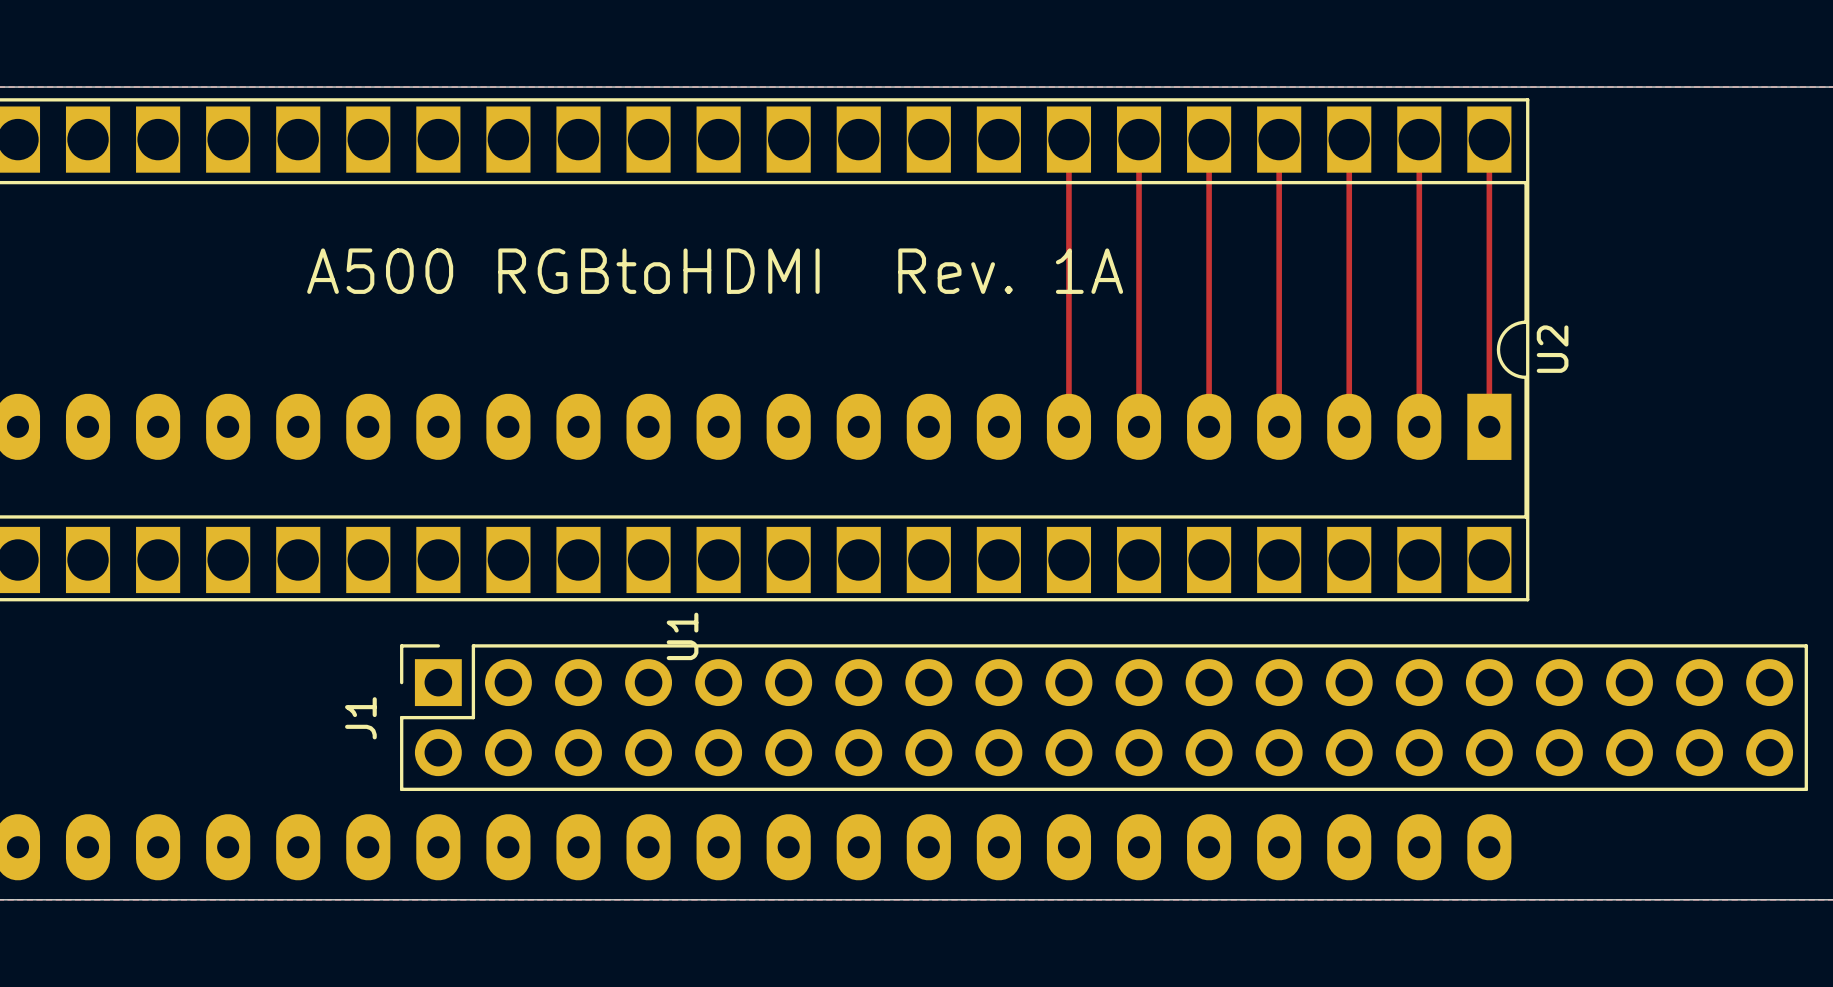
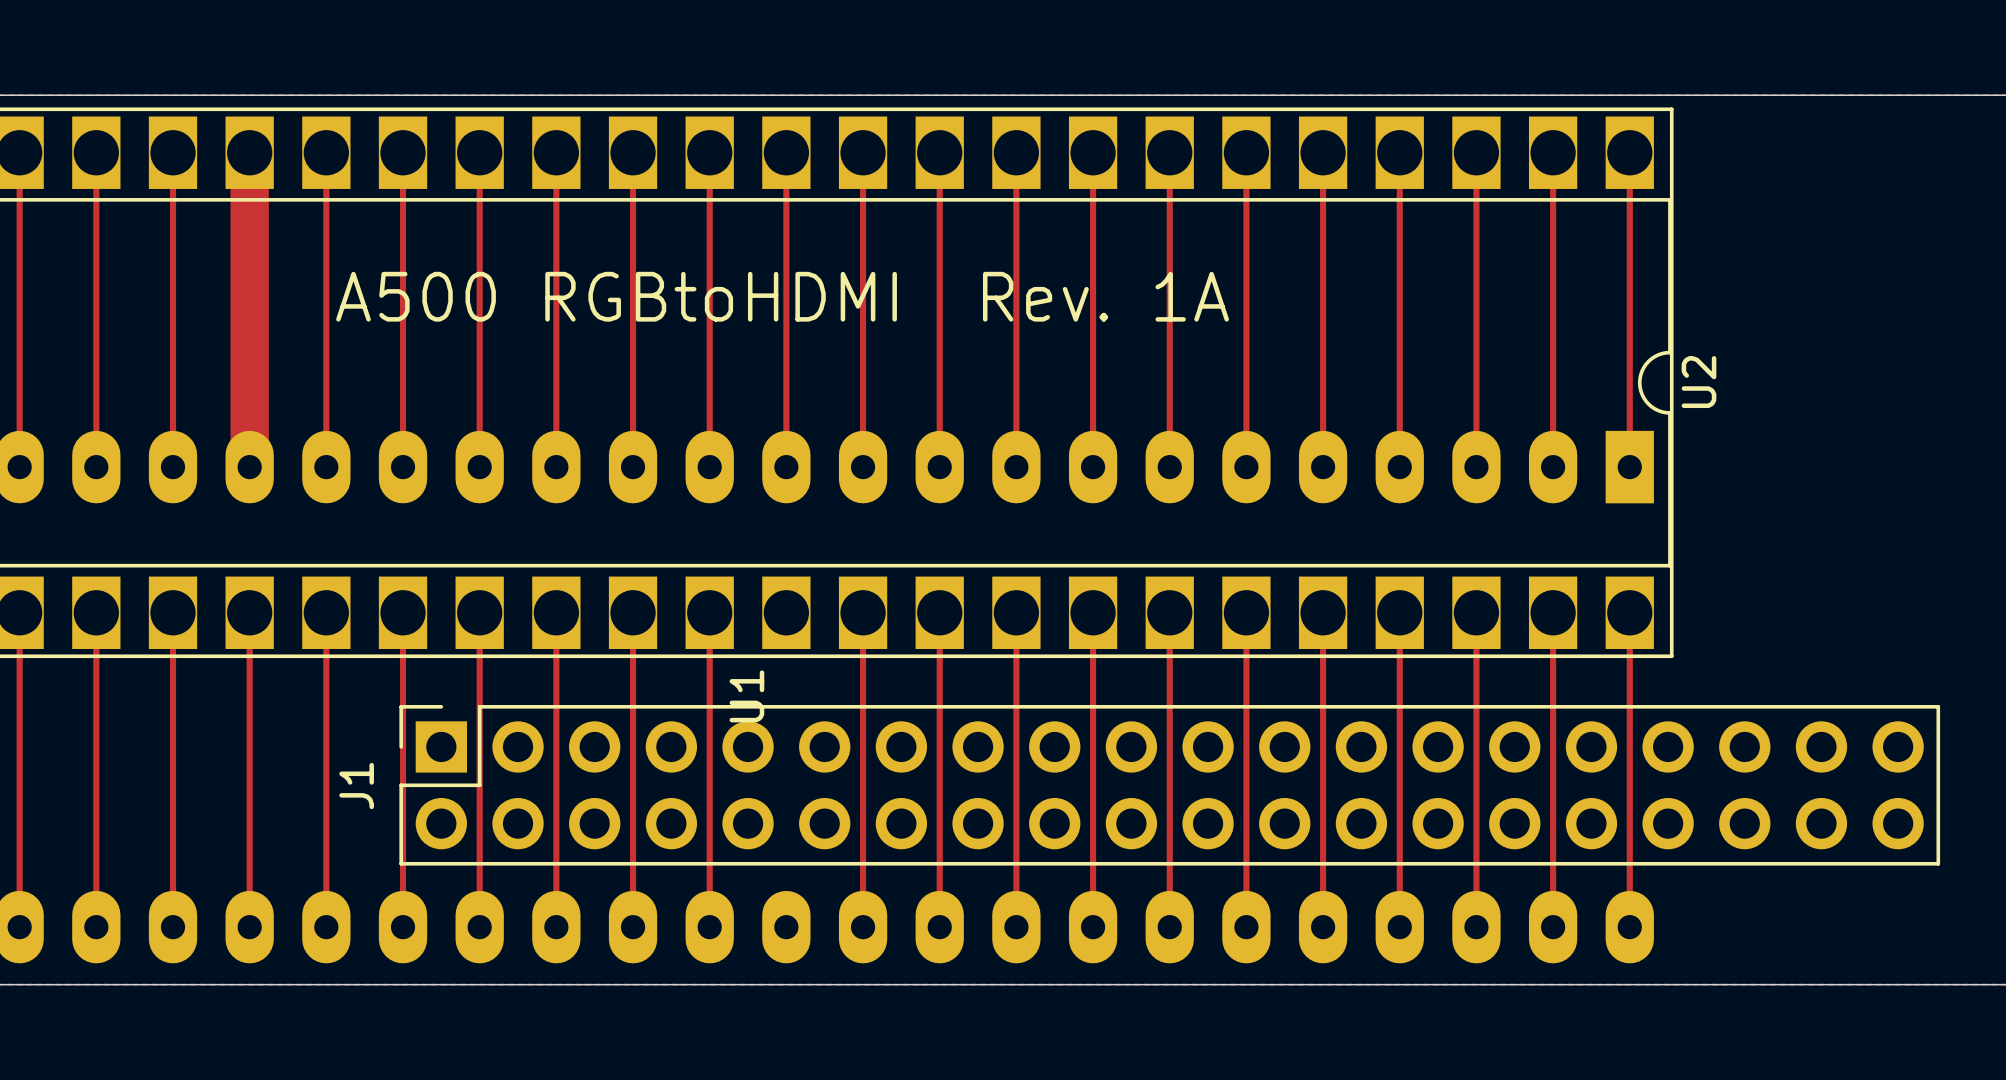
top track: none -> (19, 152) (19, 467)
top track: none -> (96, 152) (96, 467)
top track: none -> (173, 152) (173, 467)
top track: none -> (249, 152) (249, 467)
top track: none -> (326, 152) (326, 467)
top track: none -> (403, 152) (403, 467)
top track: none -> (479, 152) (479, 467)
top track: none -> (556, 152) (556, 467)
top track: none -> (633, 152) (633, 467)
top track: none -> (709, 152) (709, 467)
top track: none -> (786, 152) (786, 467)
top track: none -> (863, 152) (863, 467)
top track: none -> (939, 152) (939, 467)
top track: none -> (1016, 152) (1016, 467)
top track: none -> (1093, 152) (1093, 467)
top track: none -> (19, 612) (19, 927)
top track: none -> (96, 612) (96, 927)
top track: none -> (173, 612) (173, 927)
top track: none -> (249, 612) (249, 927)
top track: none -> (326, 612) (326, 927)
top track: none -> (403, 612) (403, 927)
top track: none -> (479, 612) (479, 927)
top track: none -> (556, 612) (556, 927)
top track: none -> (633, 612) (633, 927)
top track: none -> (709, 612) (709, 927)
top track: none -> (863, 612) (863, 927)
top track: none -> (939, 612) (939, 927)
top track: none -> (1016, 612) (1016, 927)
top track: none -> (1093, 612) (1093, 927)
top track: none -> (1169, 612) (1169, 927)
top track: none -> (1246, 612) (1246, 927)
top track: none -> (1323, 612) (1323, 927)
top track: none -> (1399, 612) (1399, 927)
top track: none -> (1476, 612) (1476, 927)
top track: none -> (1553, 612) (1553, 927)
top track: none -> (1629, 612) (1629, 927)
J1 position: (1103, 717) -> (1169, 785)

